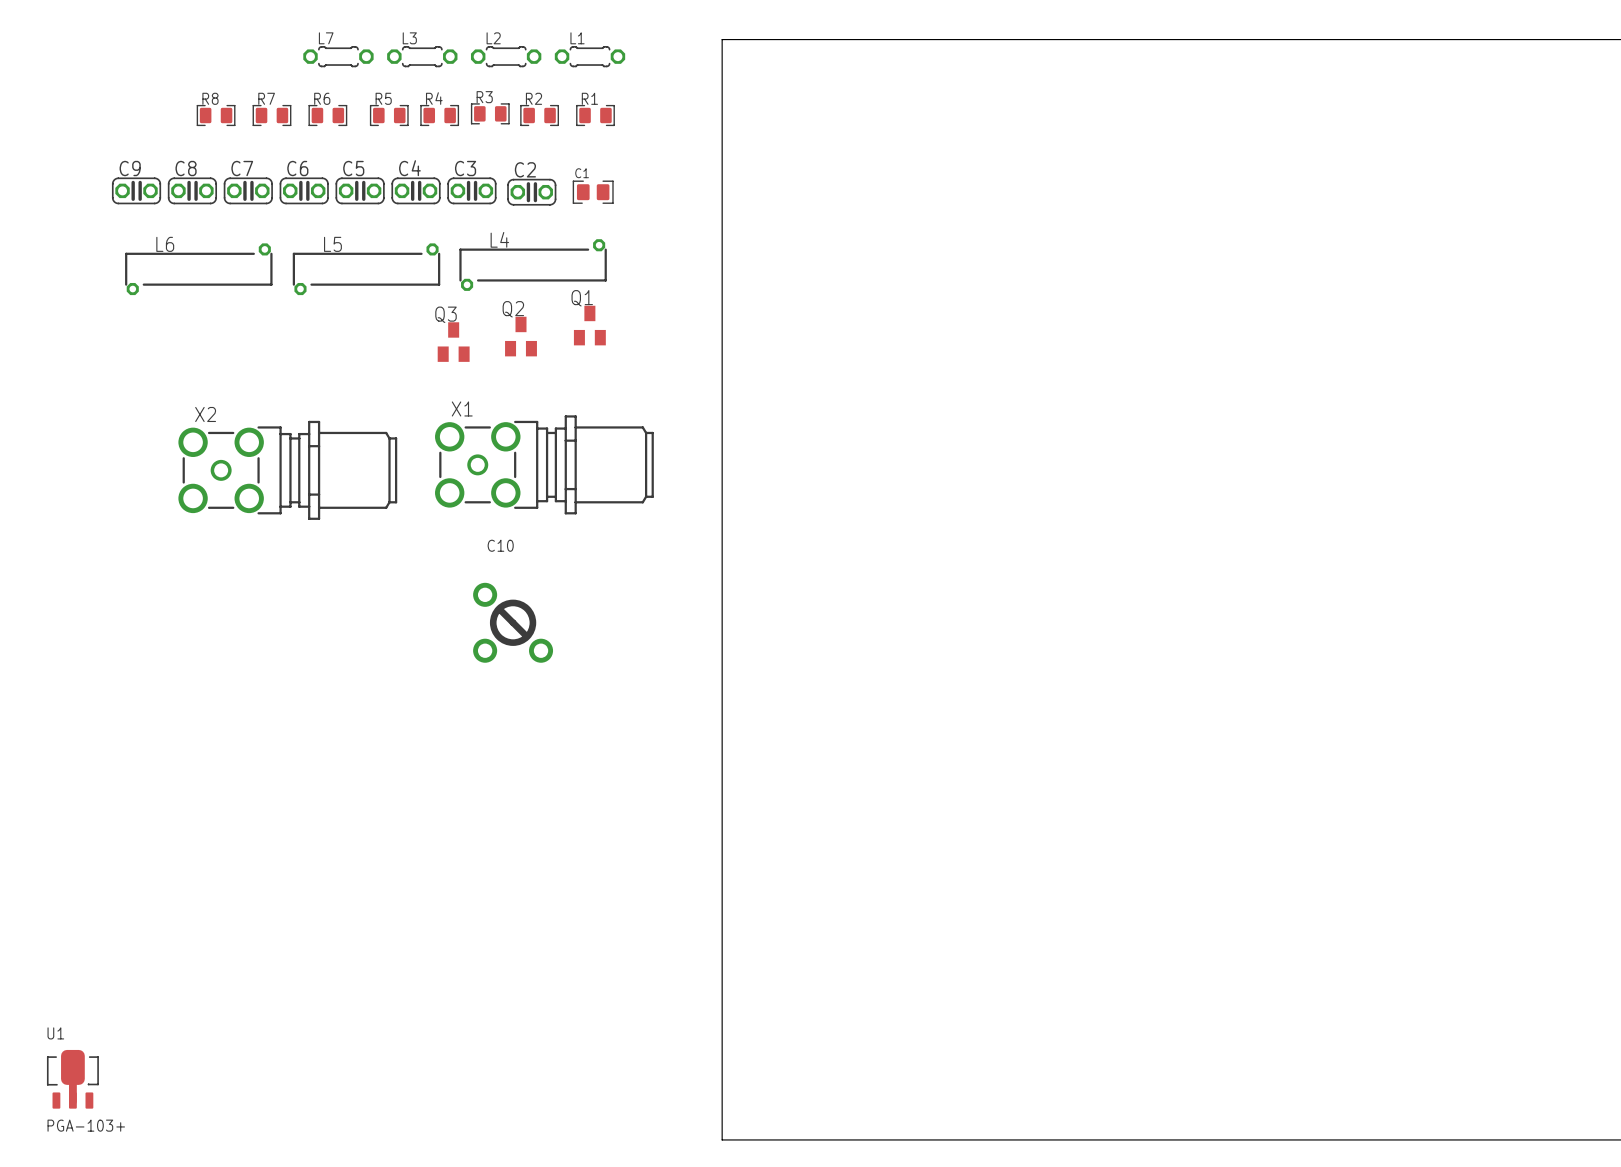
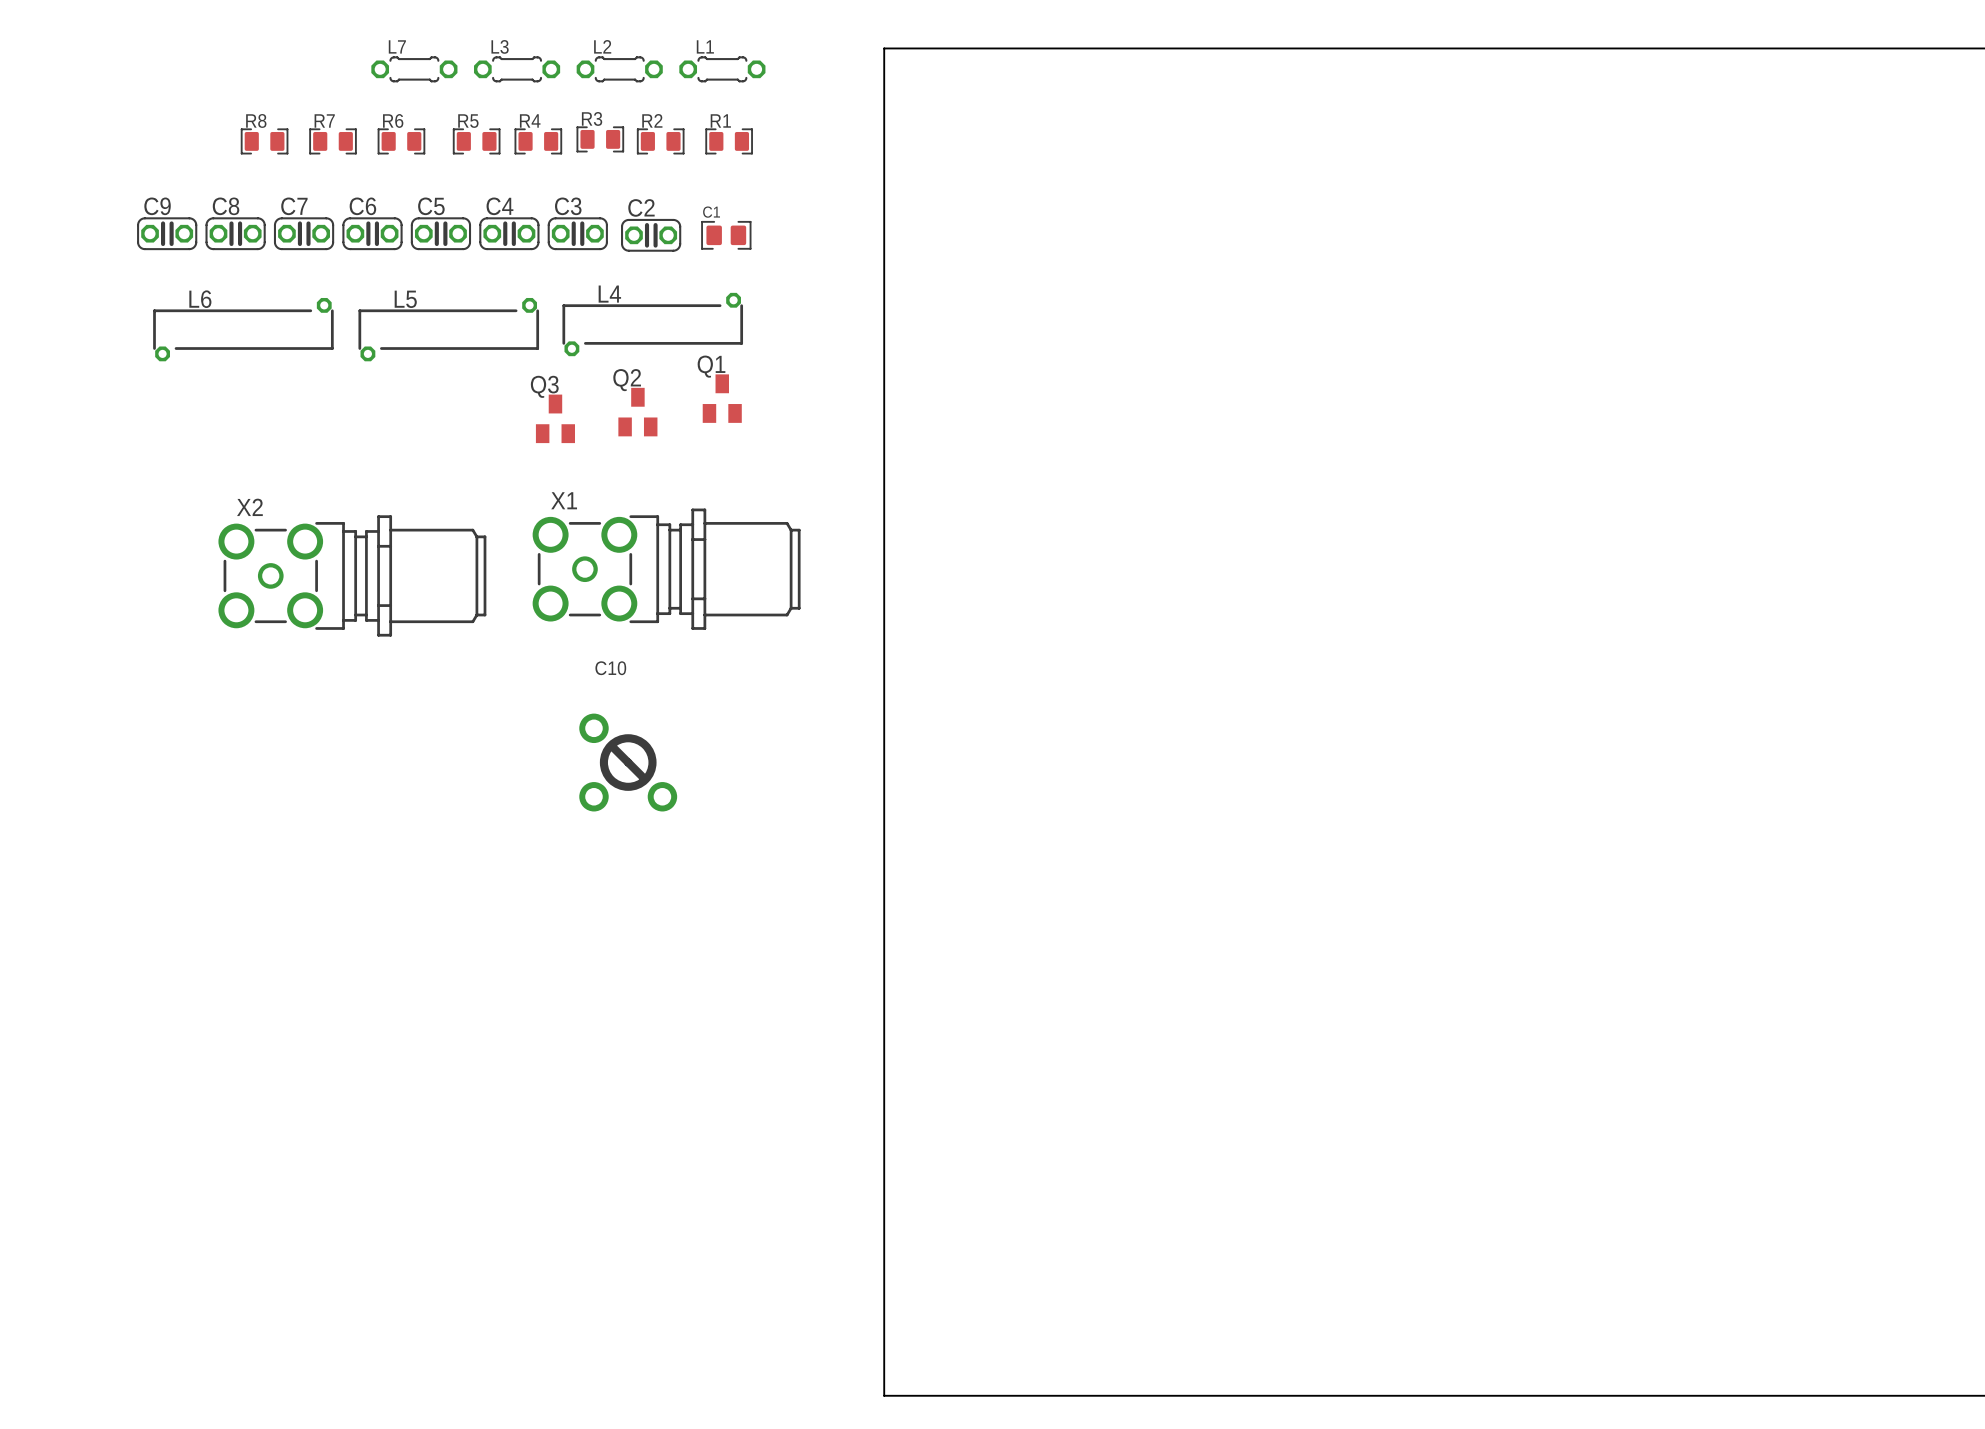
U1: PGA-103+ (72, 1079) -> none

